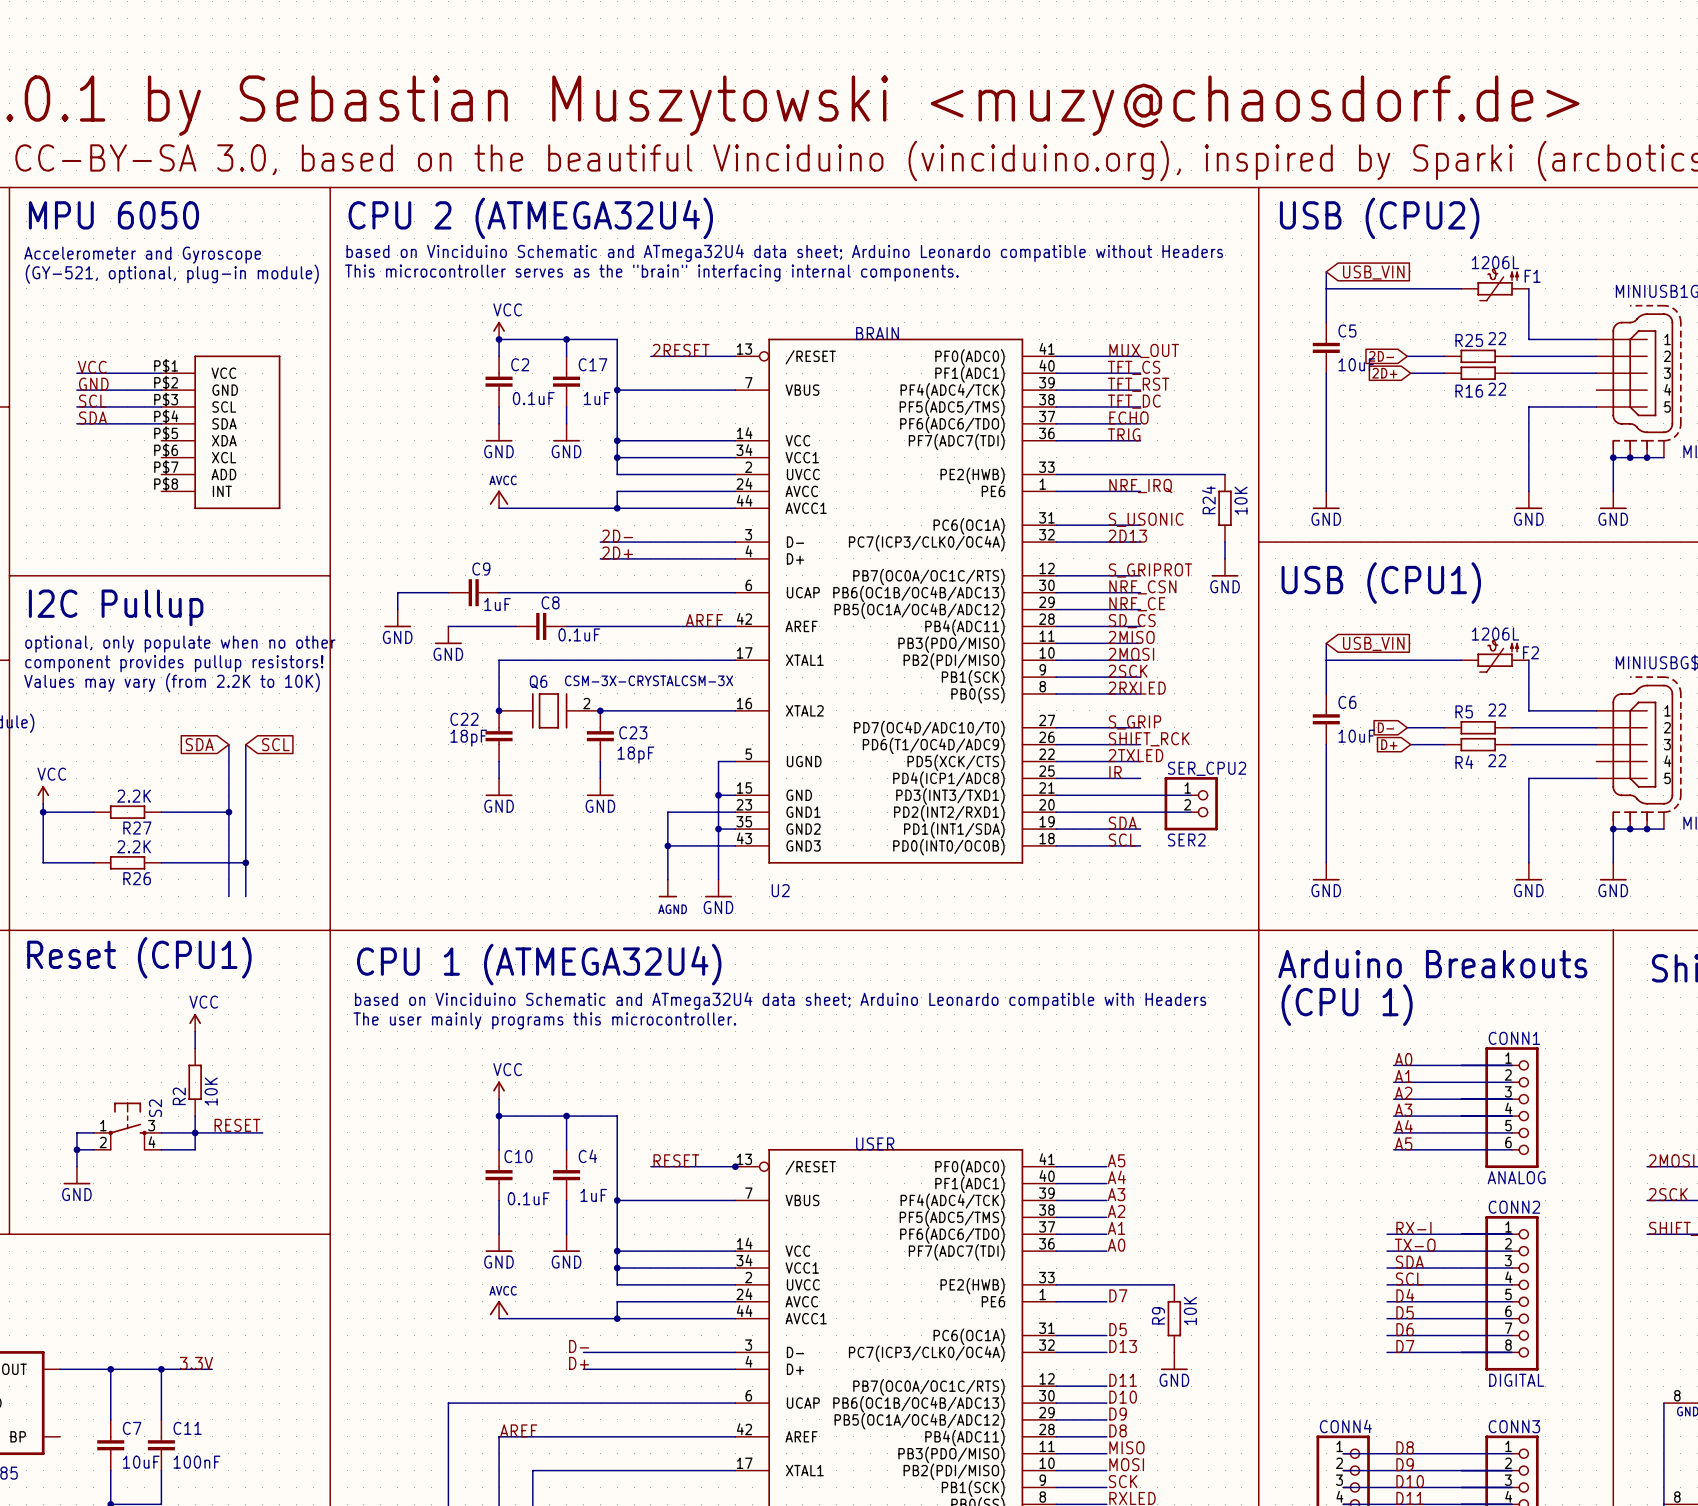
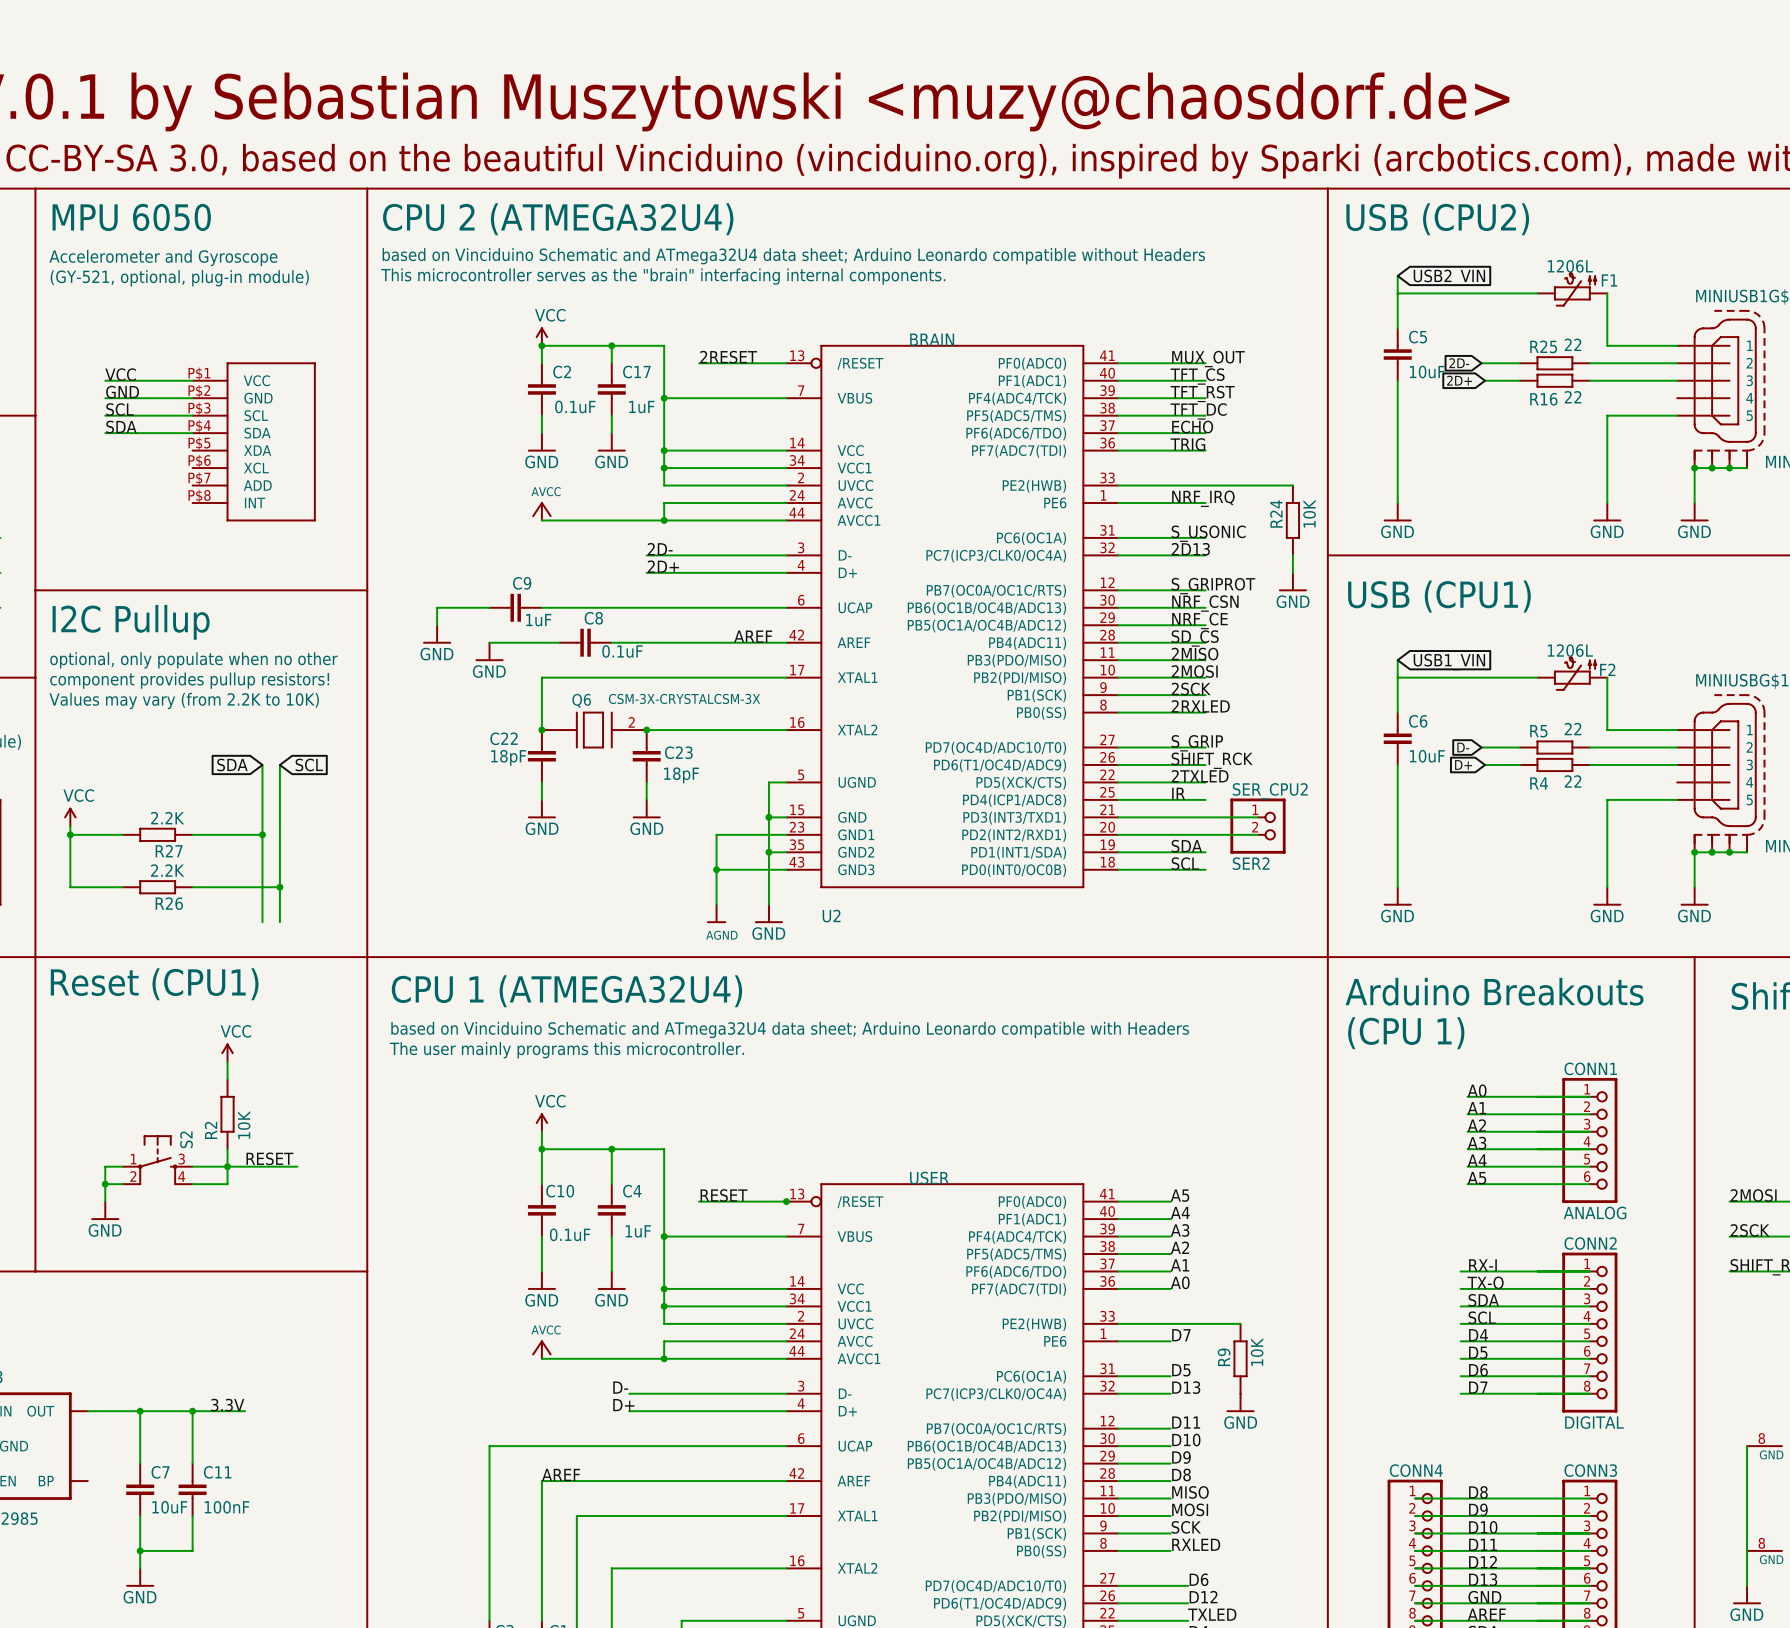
global label: USB_VIN (1373, 272) -> USB2_VIN (1449, 277)
global label: USB_VIN (1373, 643) -> USB1_VIN (1449, 662)

